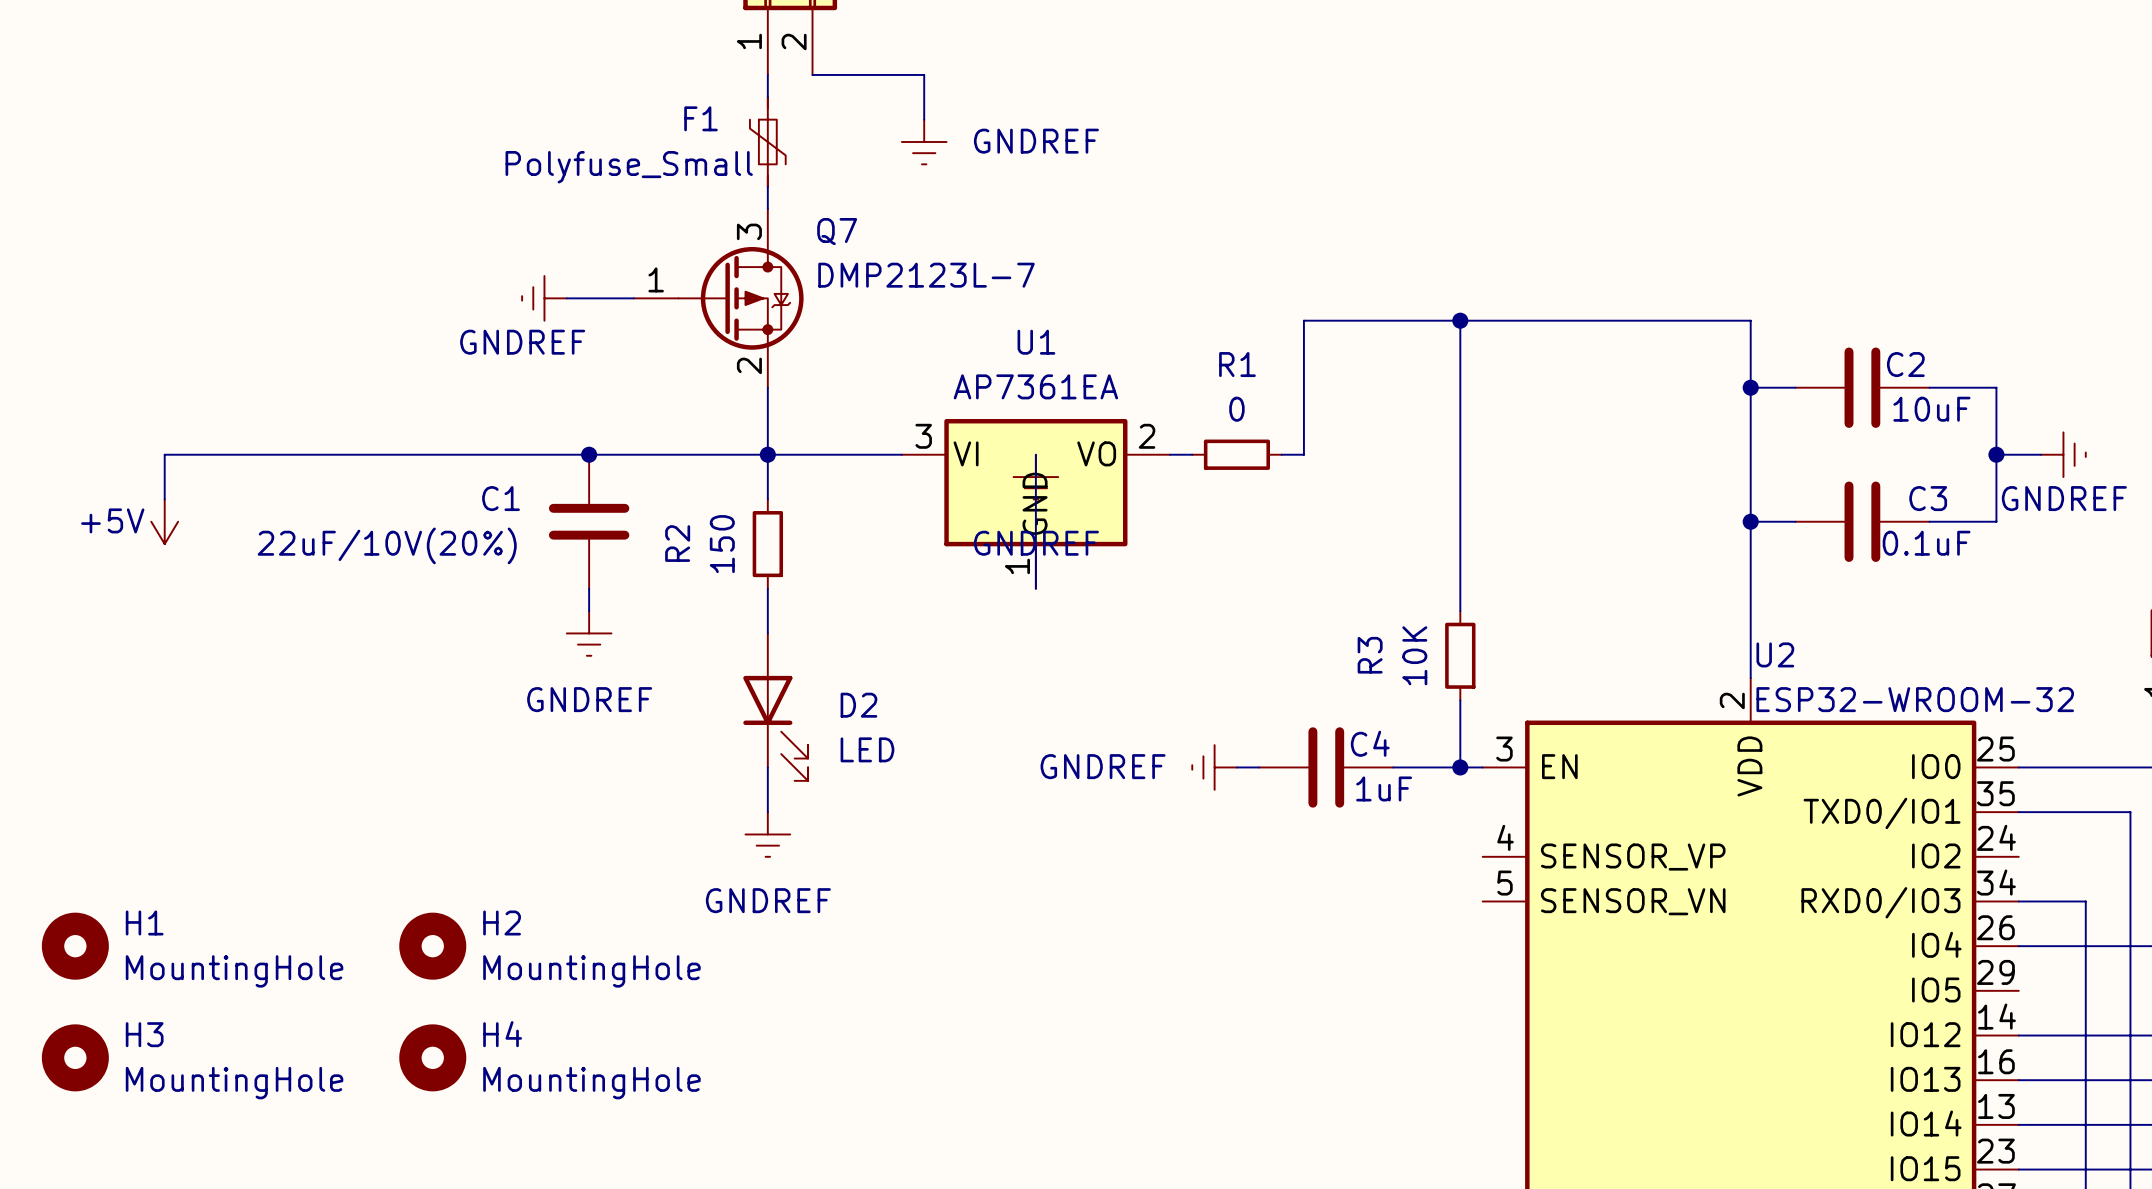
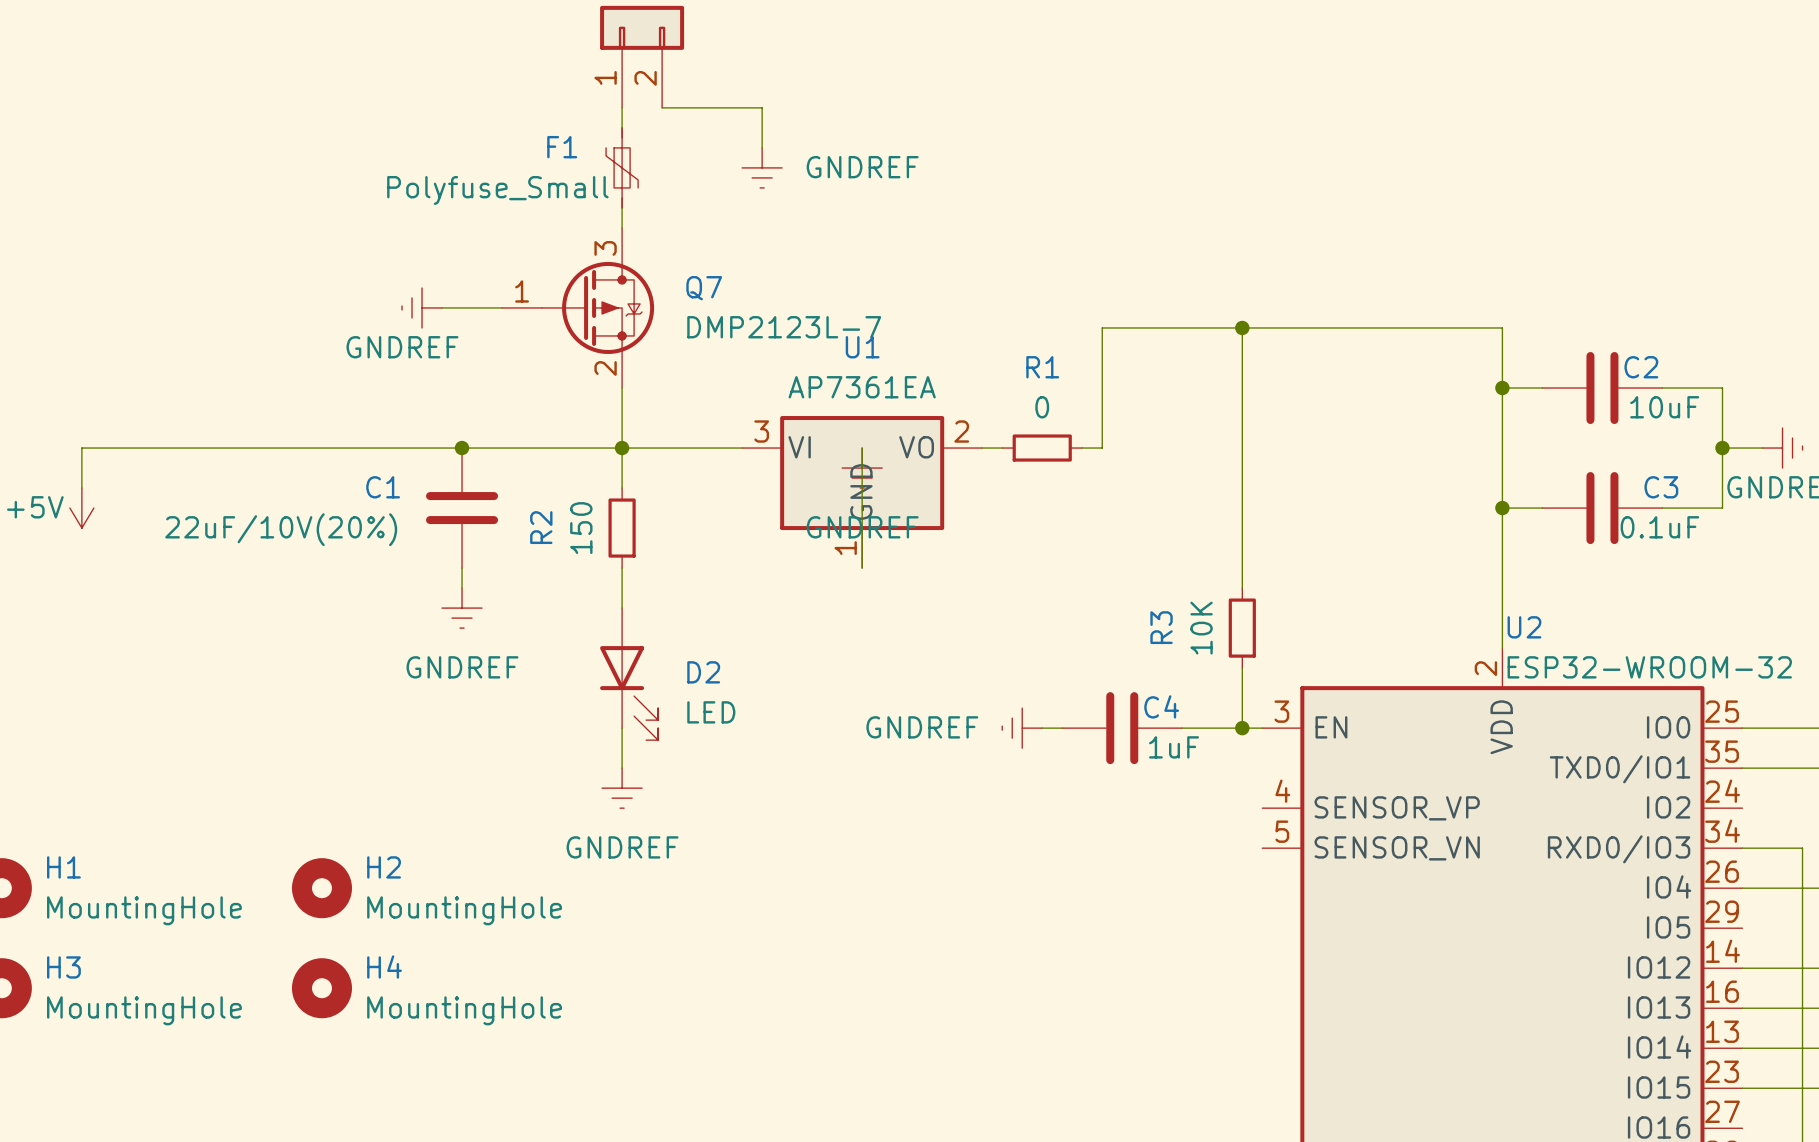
Q7 name position: Q7 (837, 231) -> Q7 (704, 288)
Q7 value position: DMP2123L-7 (926, 275) -> DMP2123L-7 (784, 327)

